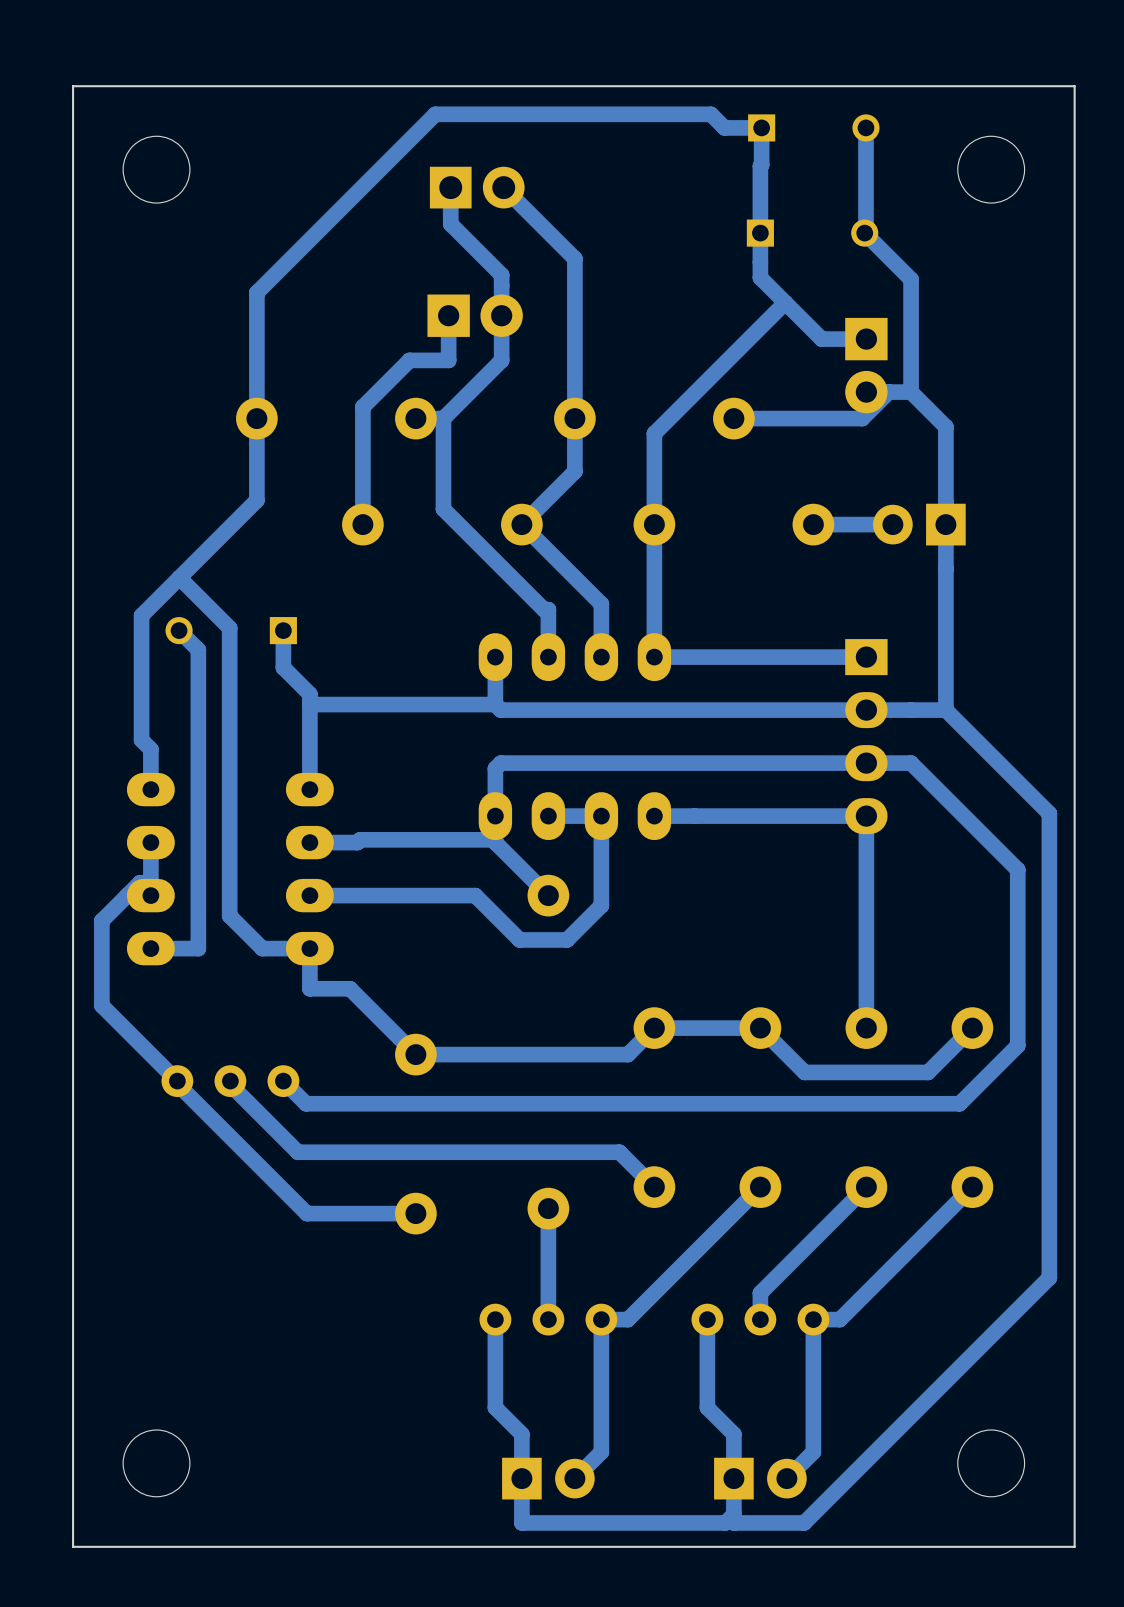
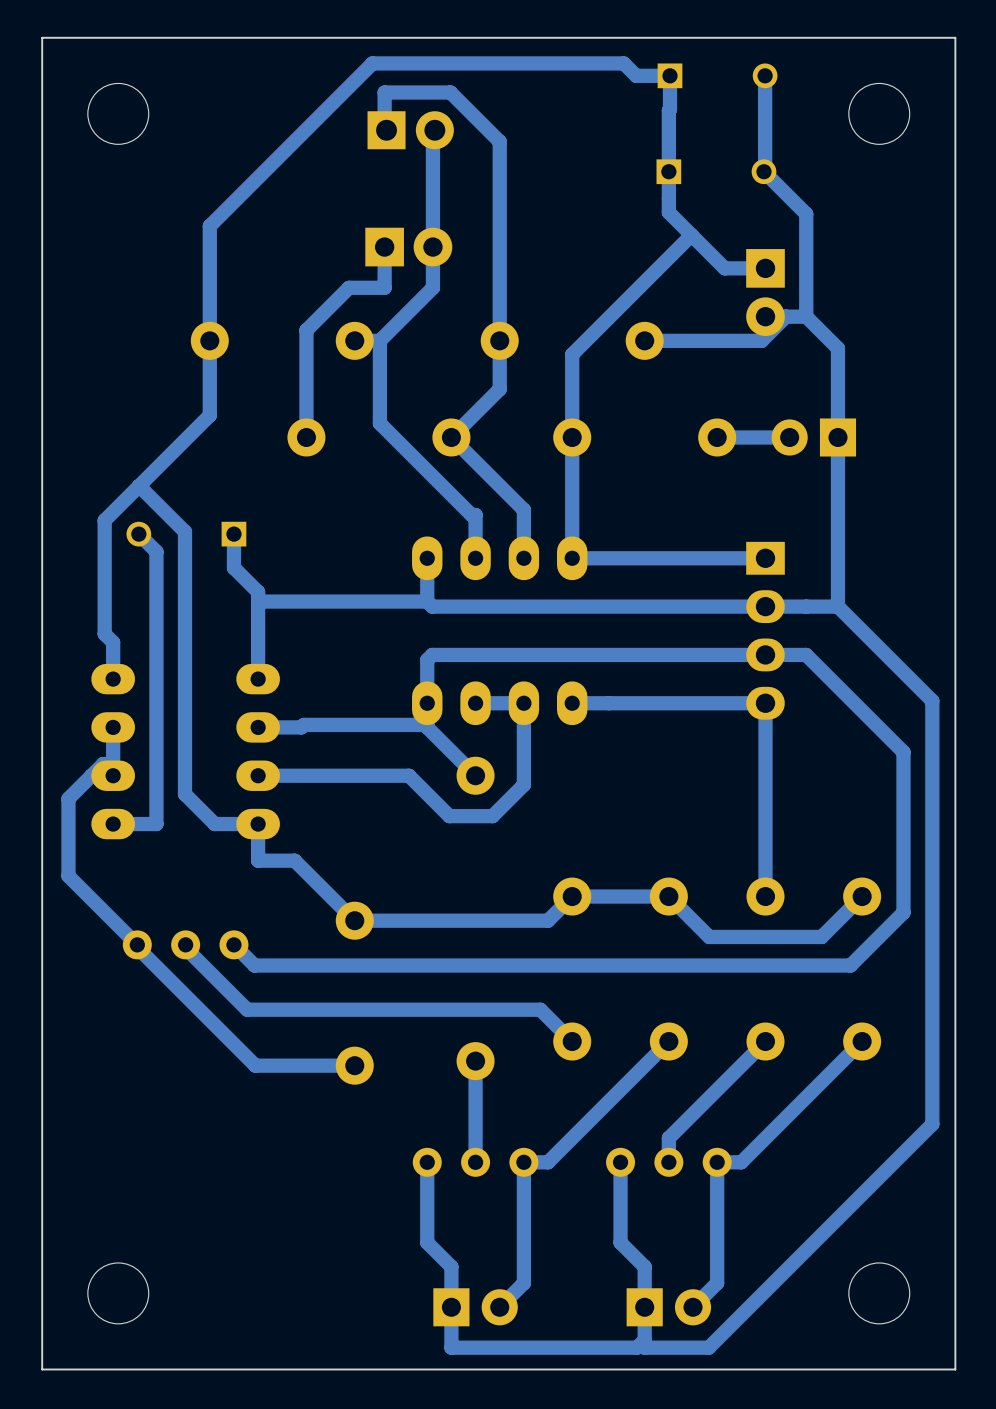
track: (450, 187) (450, 224) (501, 275) -> (432, 132) (432, 209)
track: (503, 187) (574, 258) -> (384, 132) (384, 92) (450, 92) (499, 141) (499, 195)

